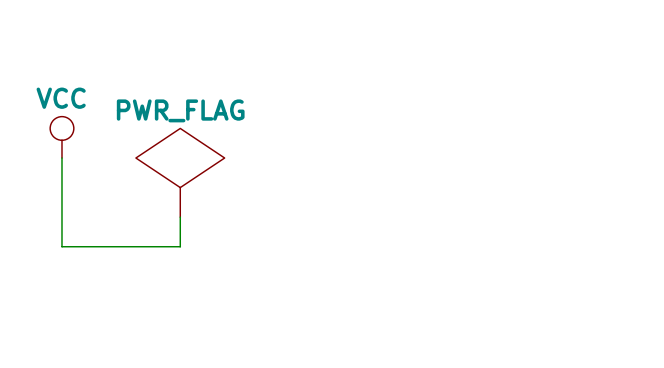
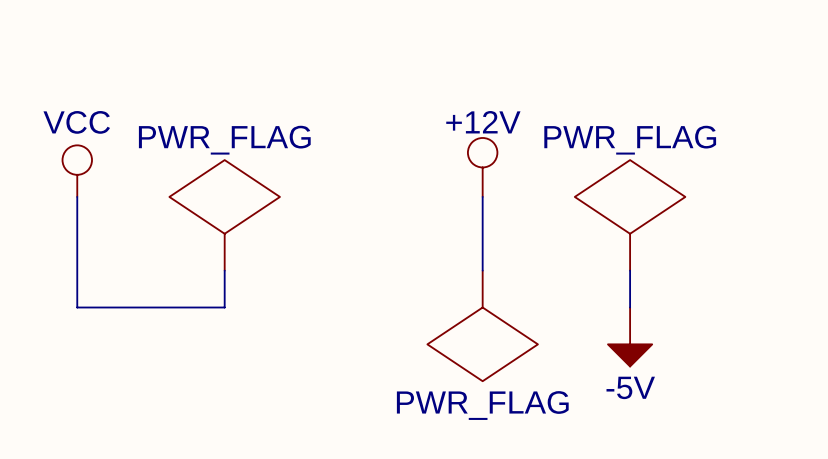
power symbol: none -> +12V (482, 167)
wire: none -> (482, 196) (482, 270)
power symbol: none -> PWR_FLAG (630, 215)
wire: none -> (630, 270) (630, 307)
power symbol: none -> PWR_FLAG (482, 325)
power symbol: none -> -5V (630, 336)

